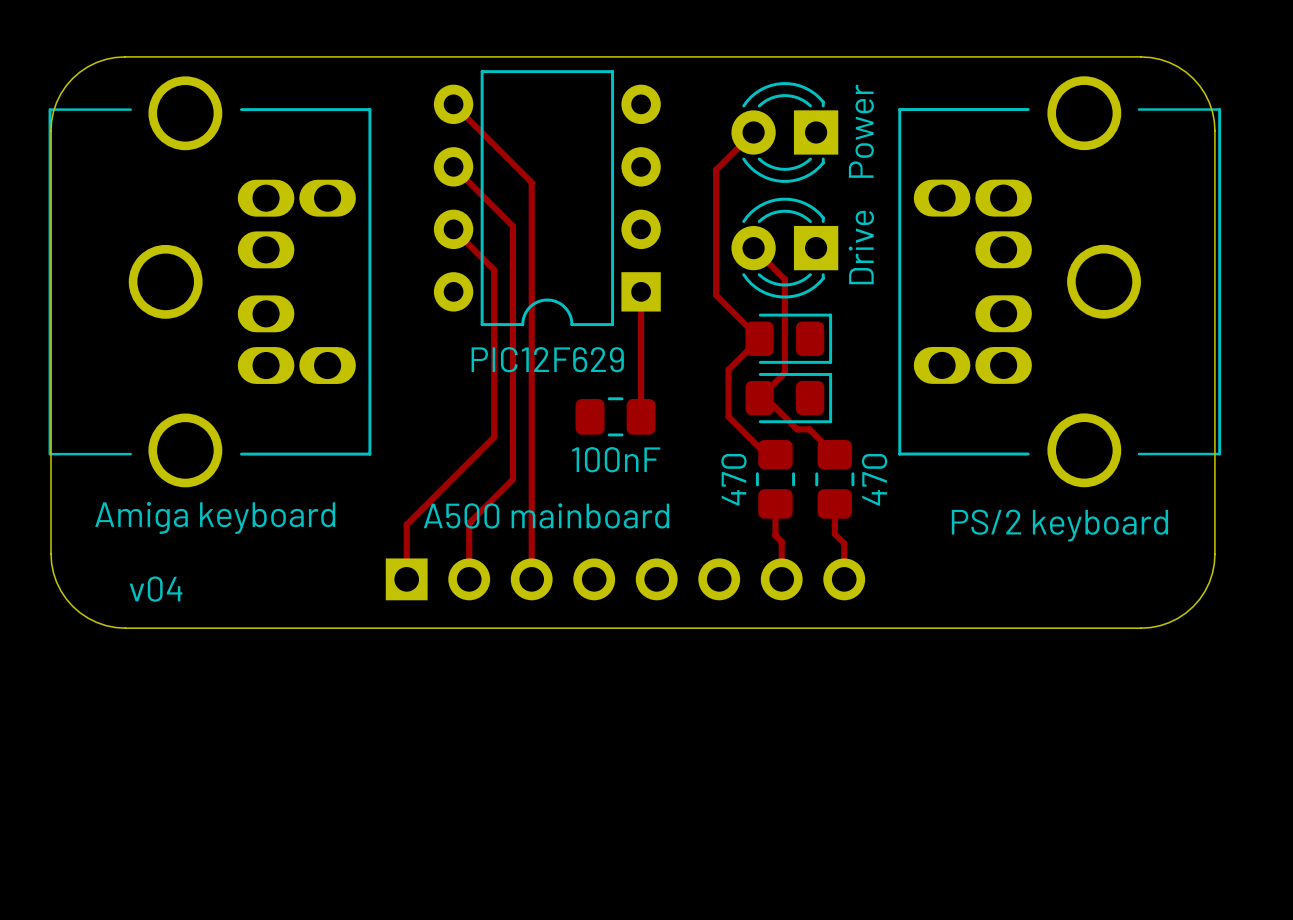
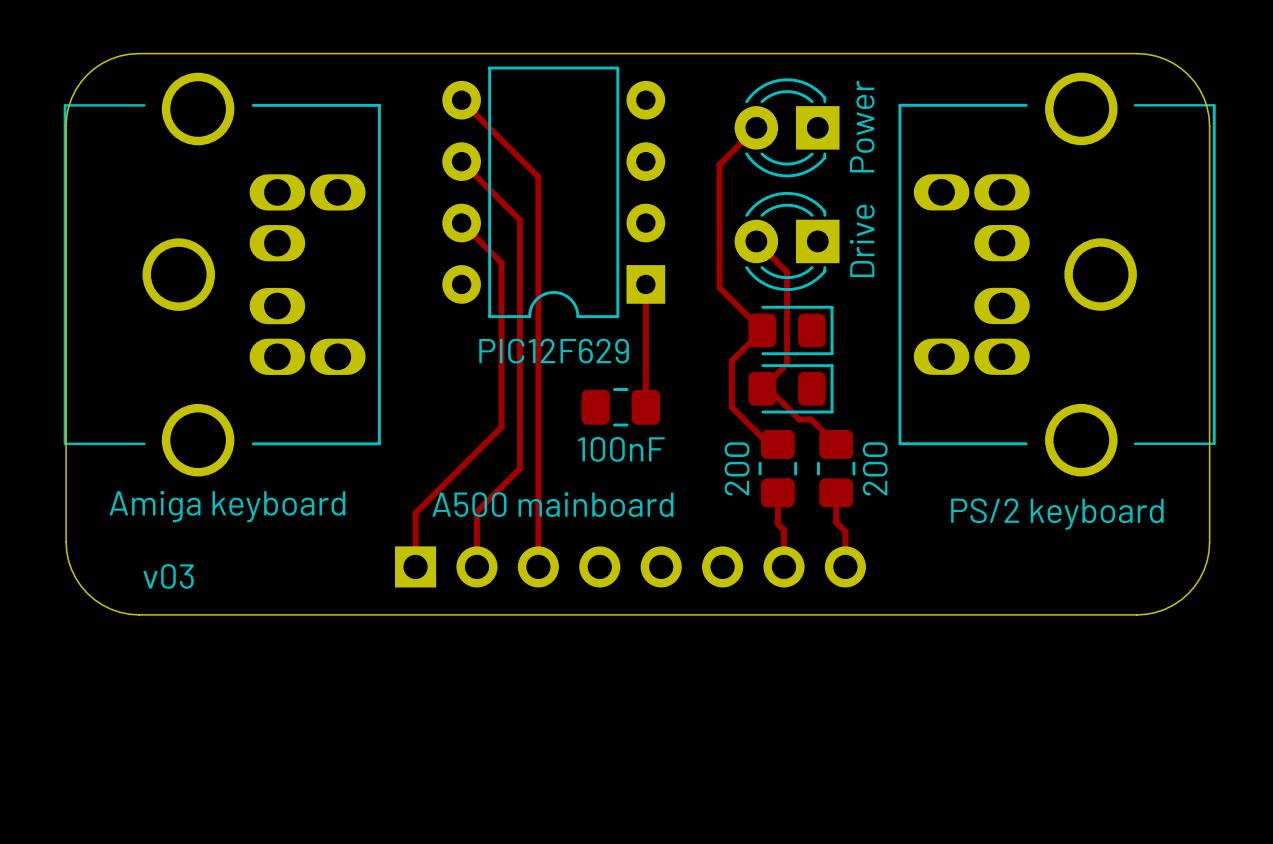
part value: 470 (733, 479) -> 200 (737, 468)
part value: 470 (874, 479) -> 200 (875, 468)
text: v04 (156, 589) -> v03 (168, 576)

